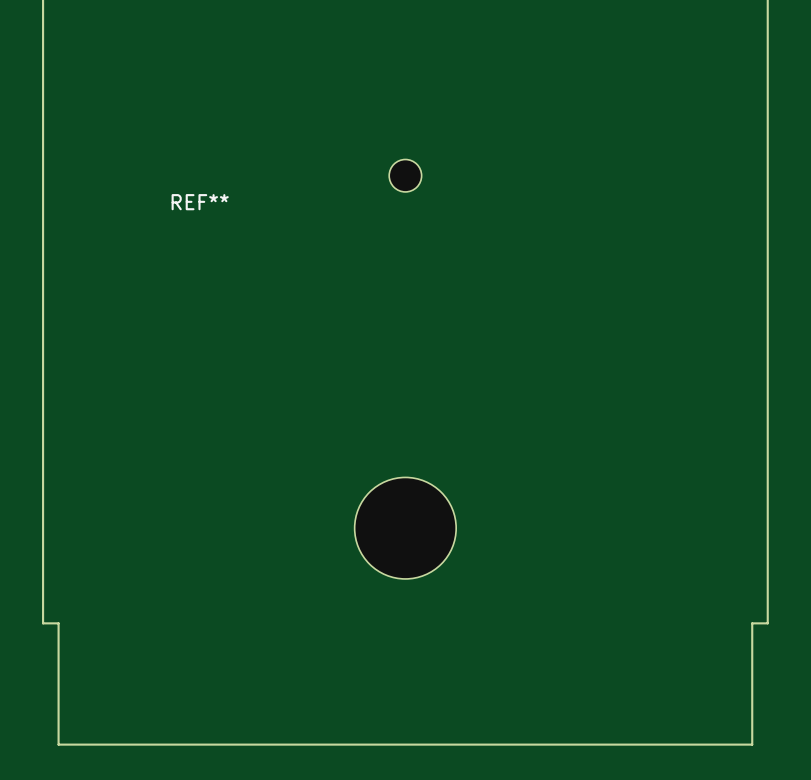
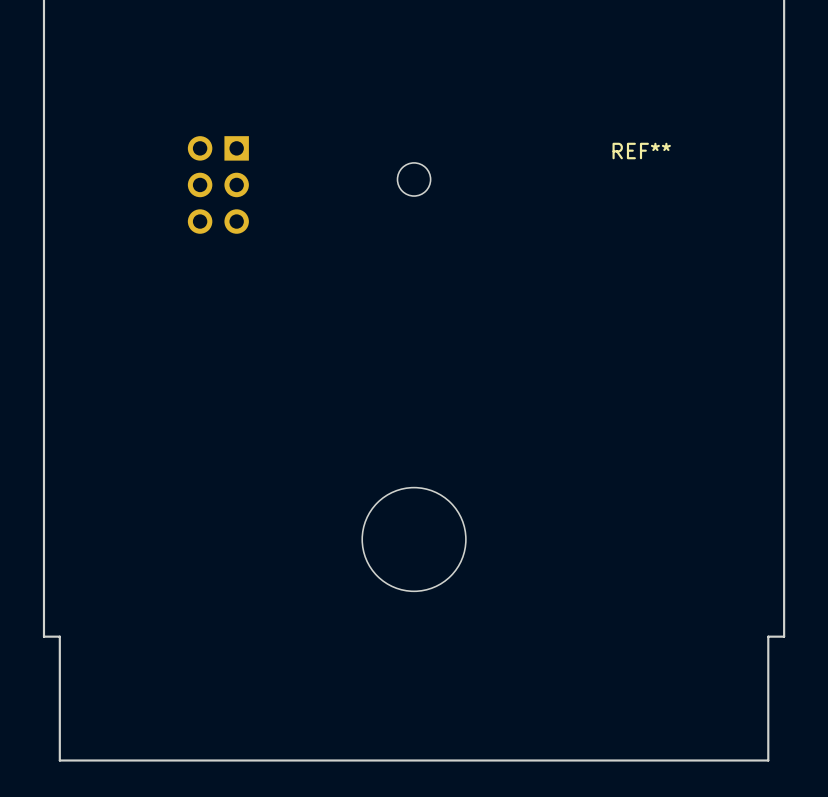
REF**: none -> (641, 151)
part: none -> (218, 184)
REF**: (200, 202) -> none

